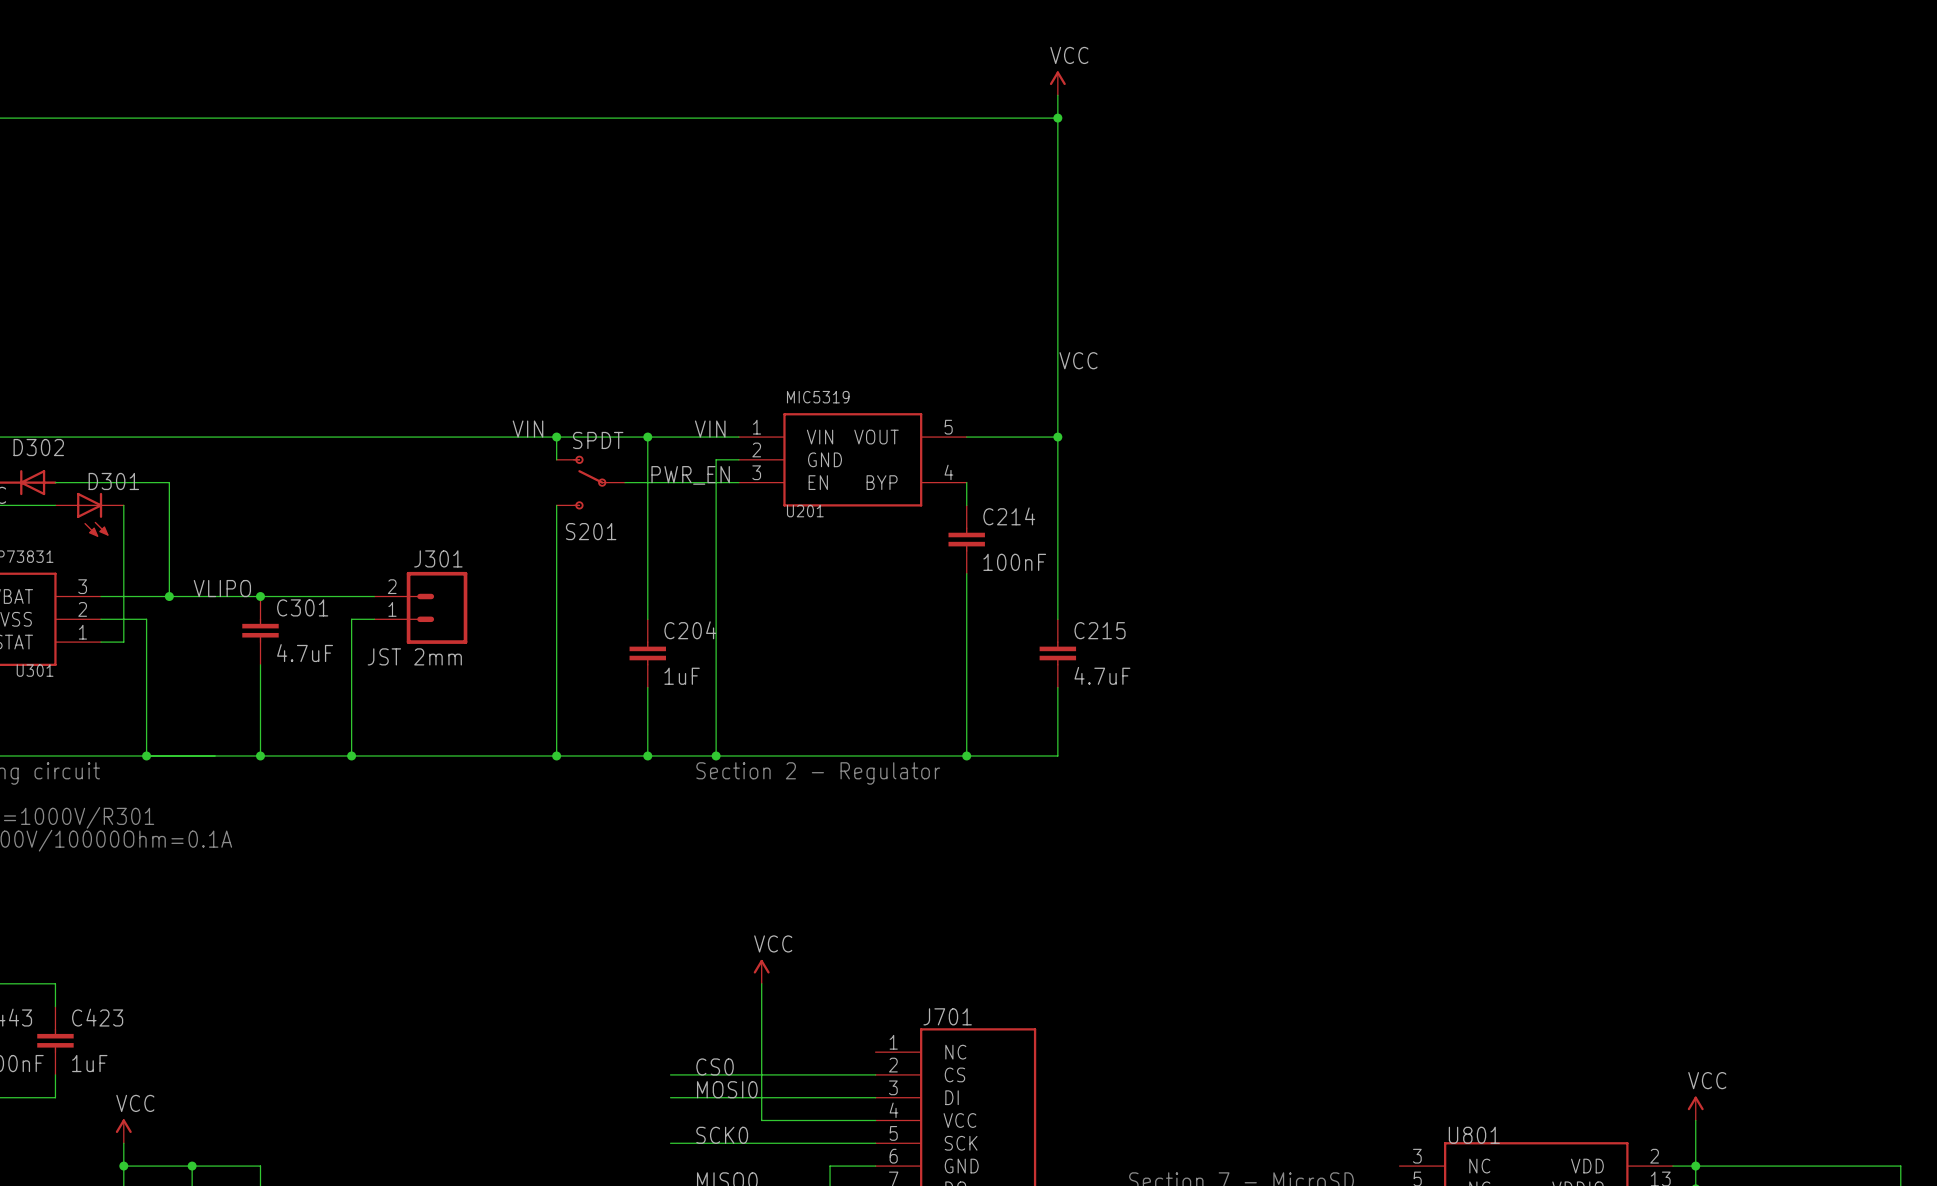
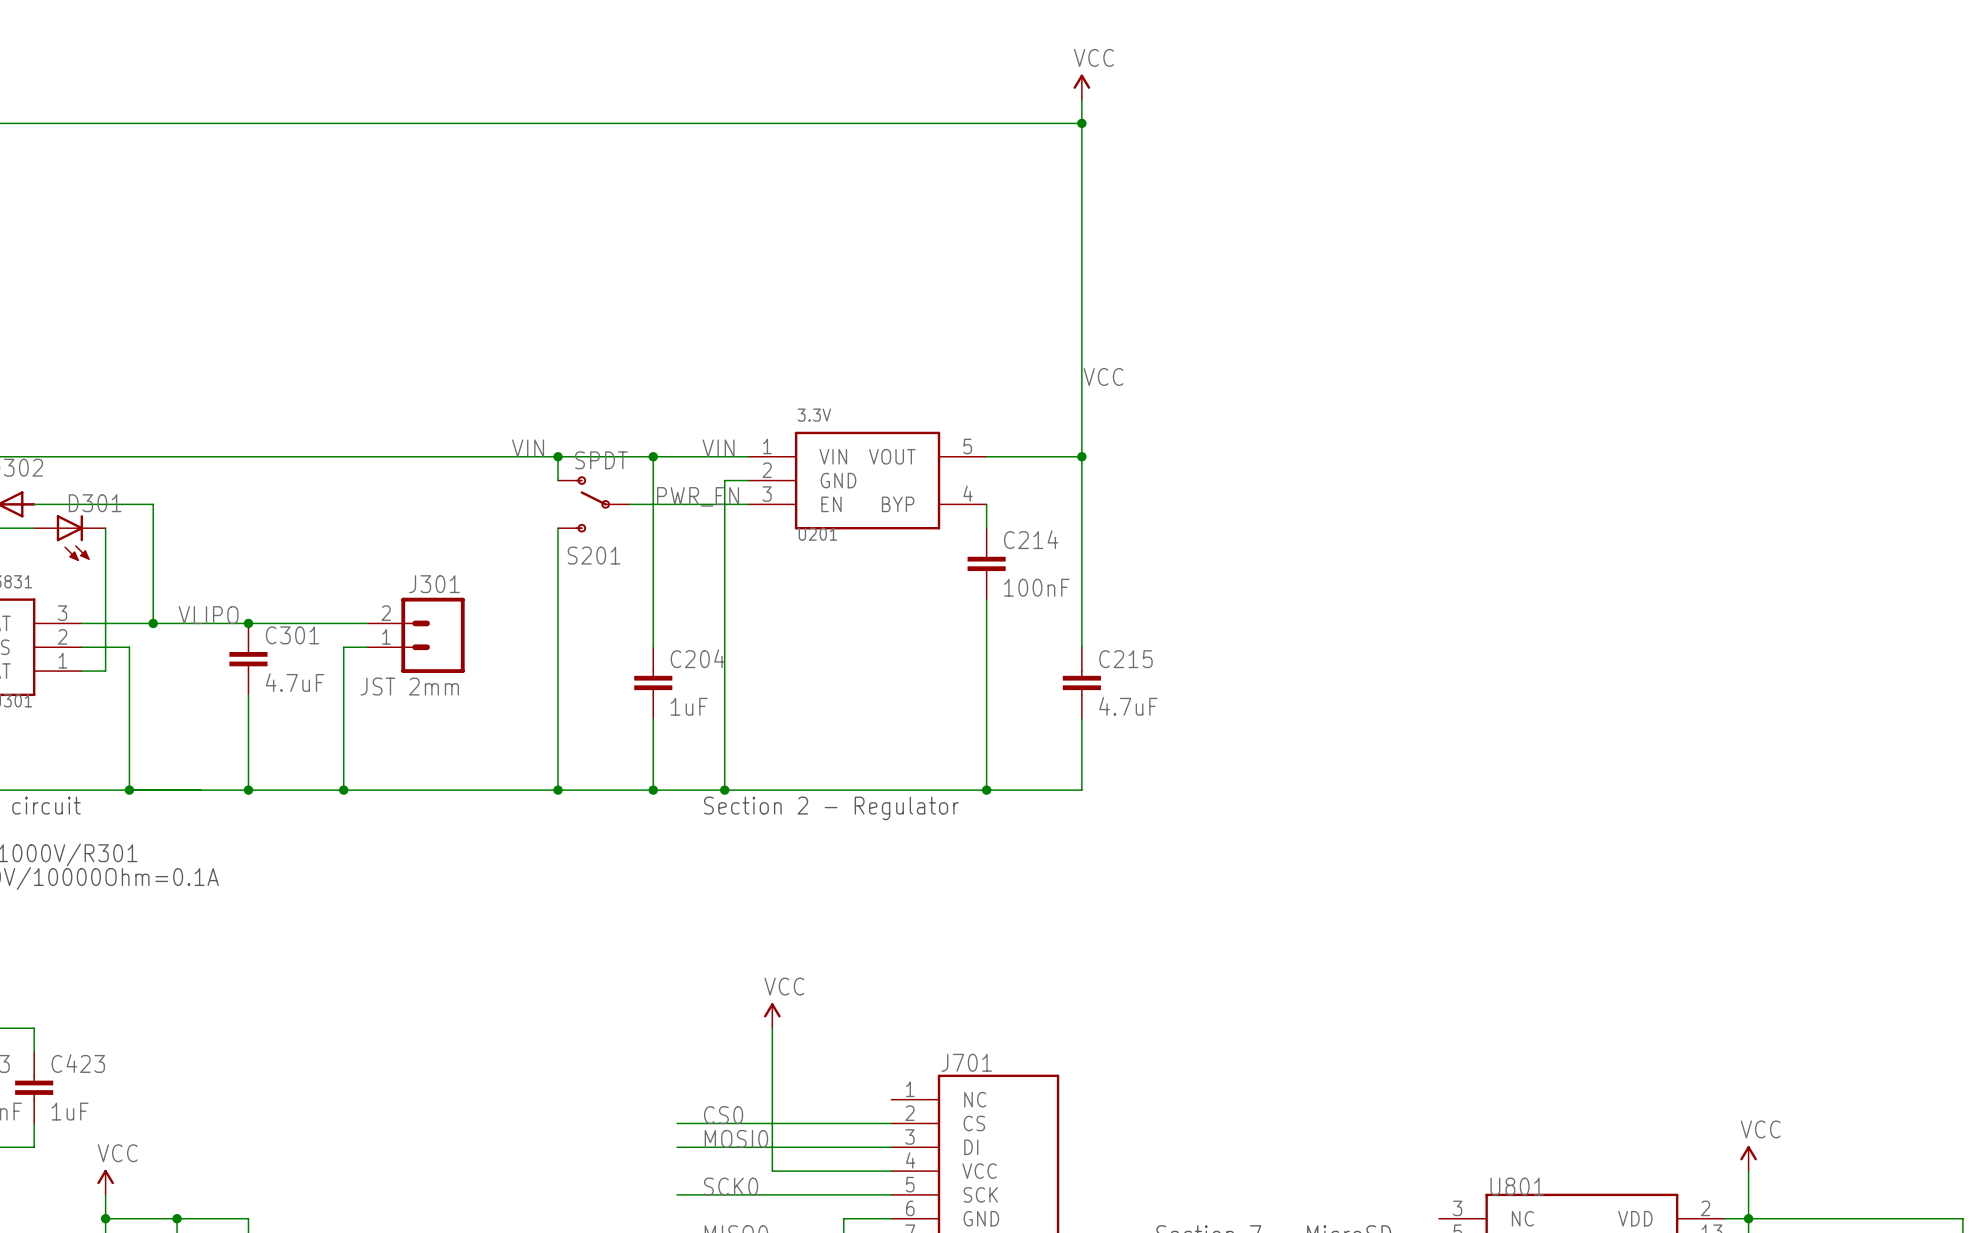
U201 value: MIC5319 (818, 397) -> 3.3V (814, 415)

